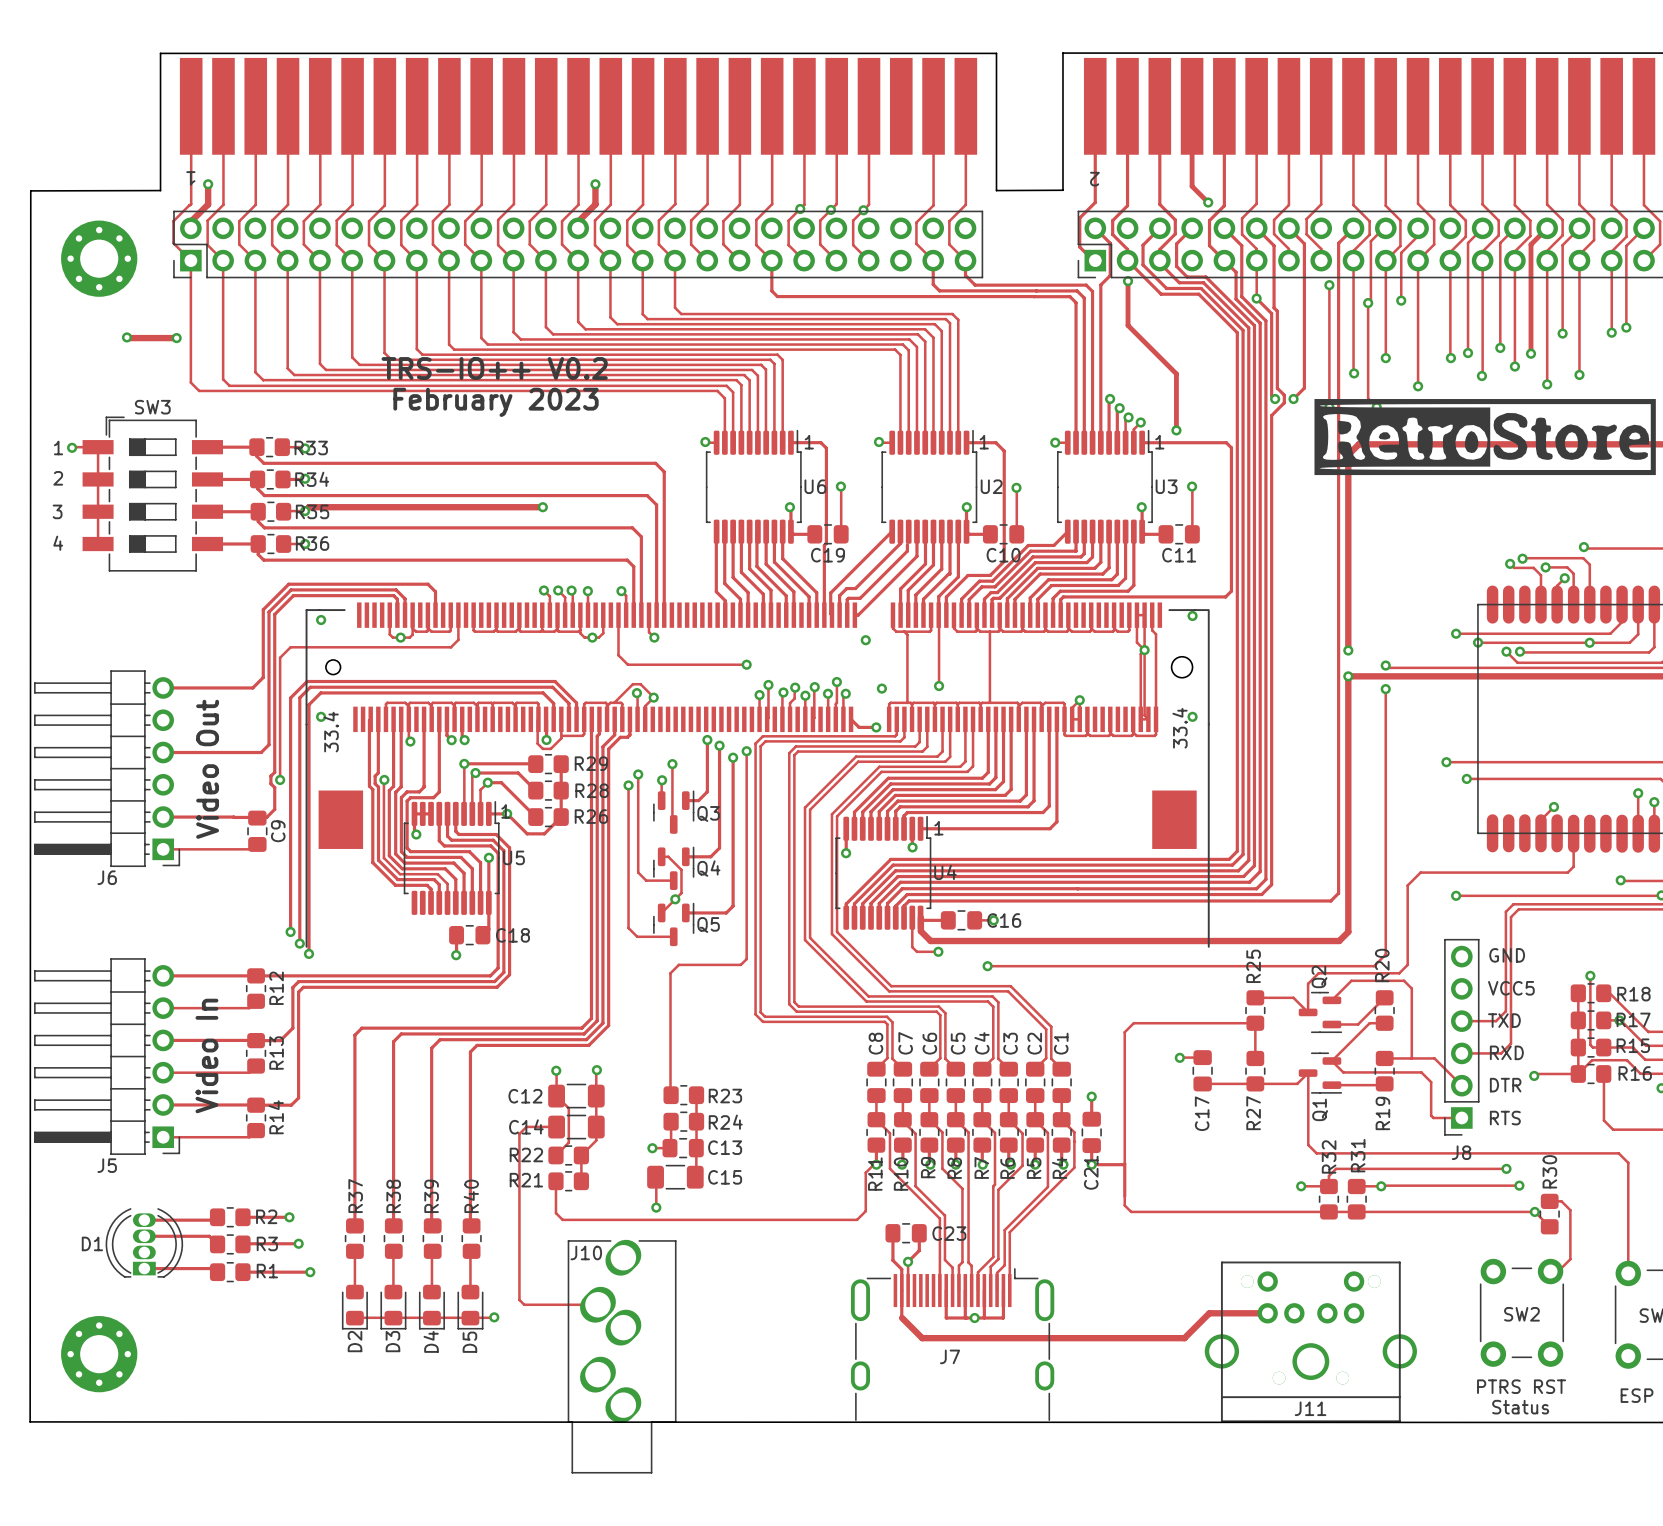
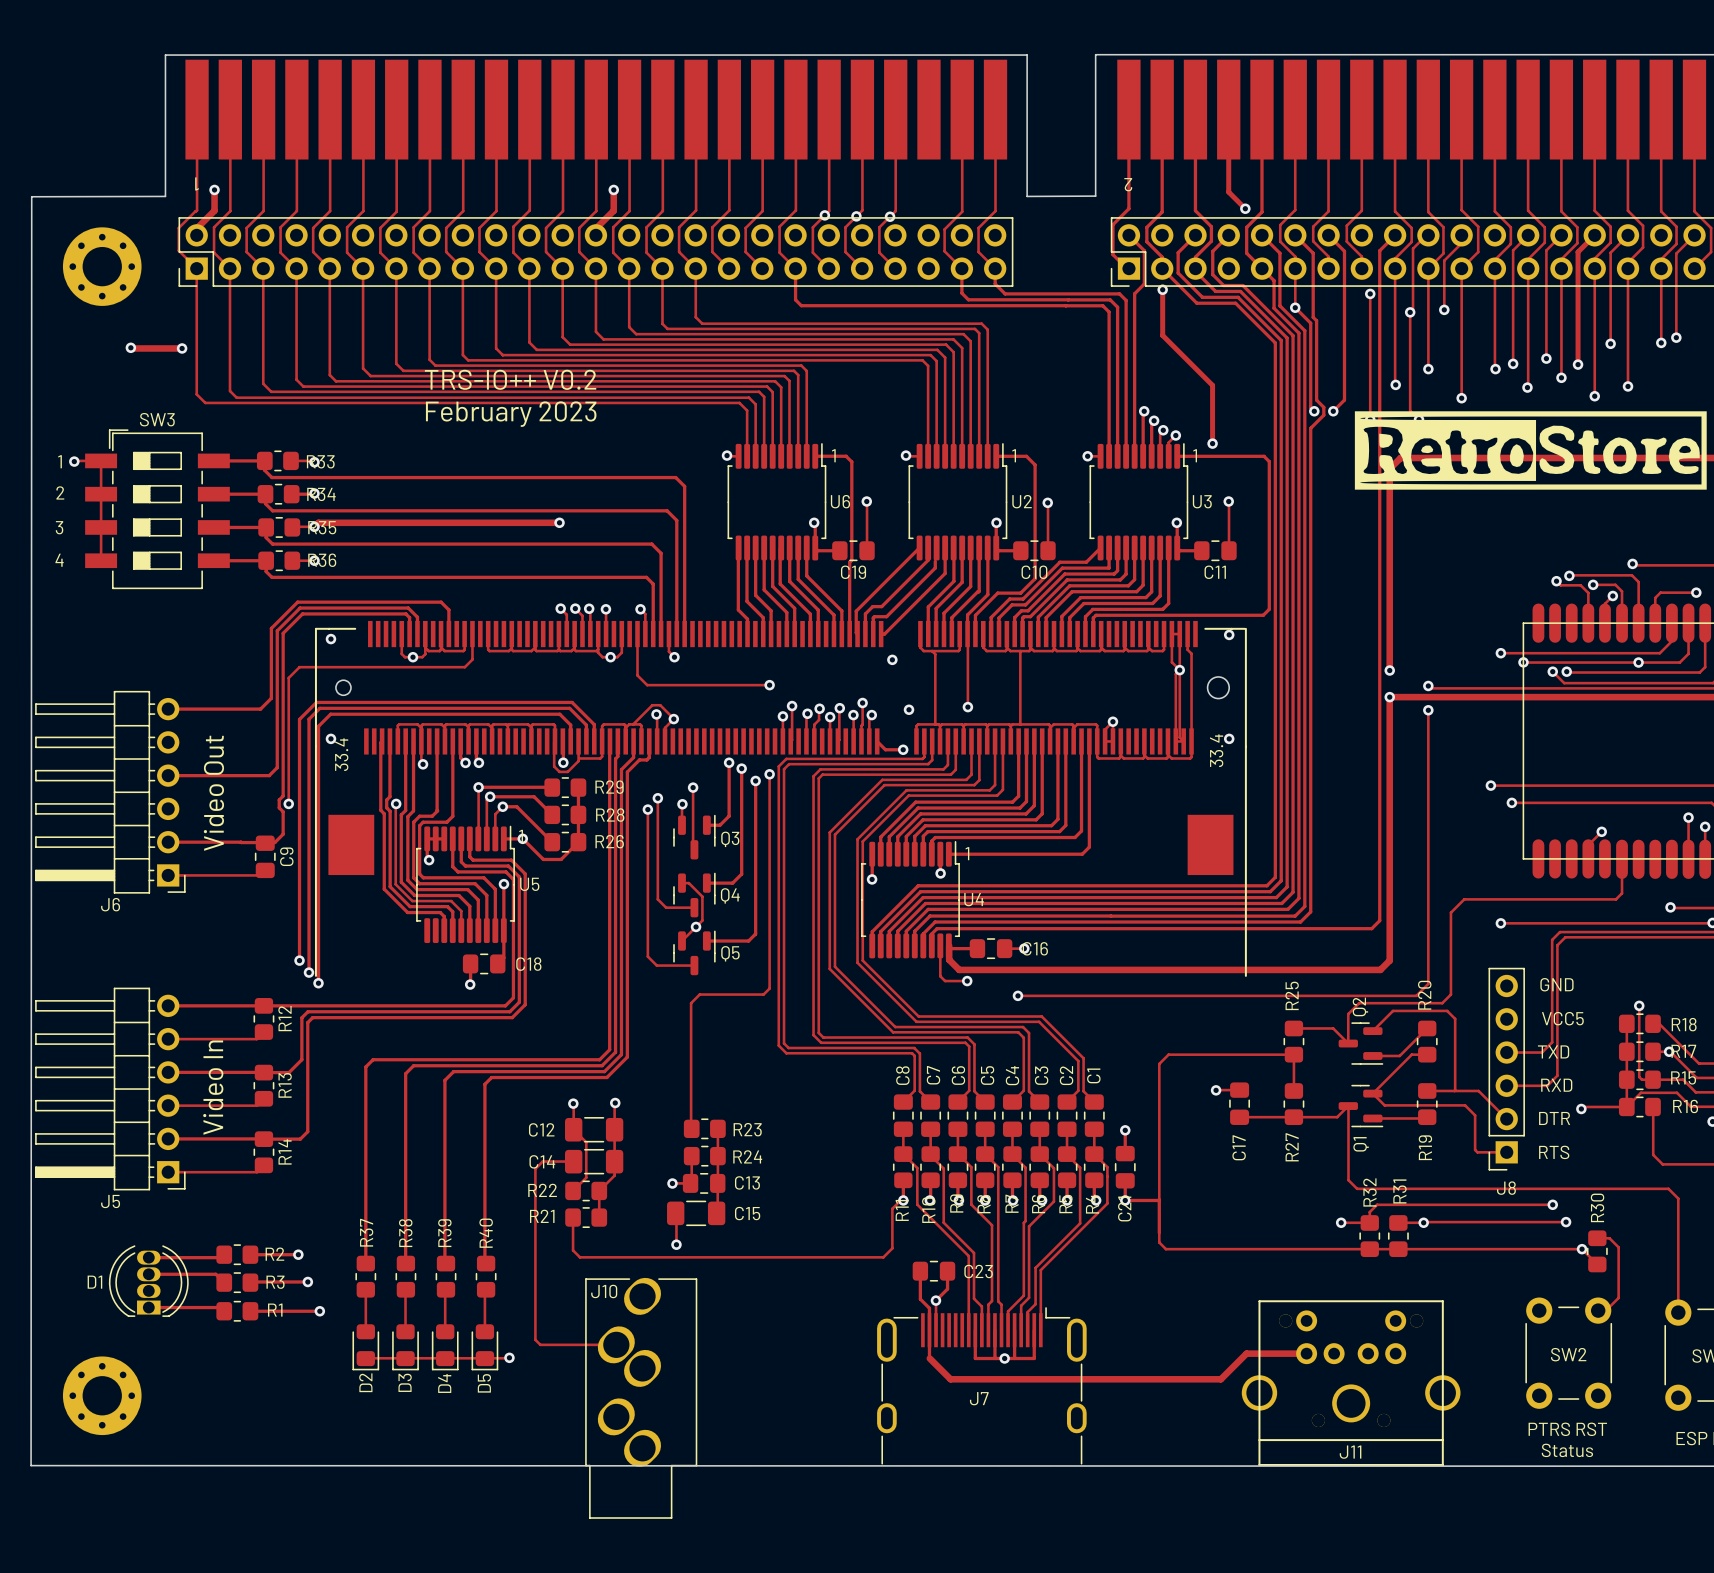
track: none -> (1696, 592) (1660, 592) (1655, 597) (1655, 623)
via: none -> (1696, 592)

